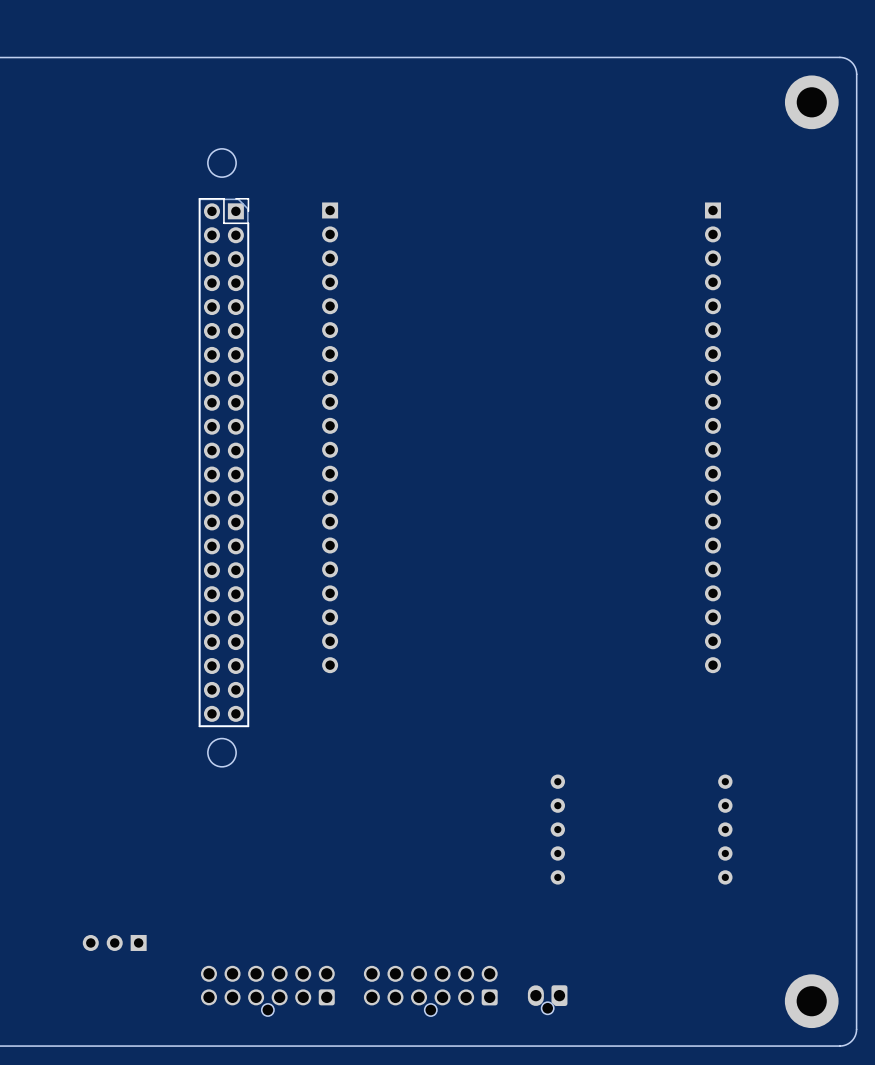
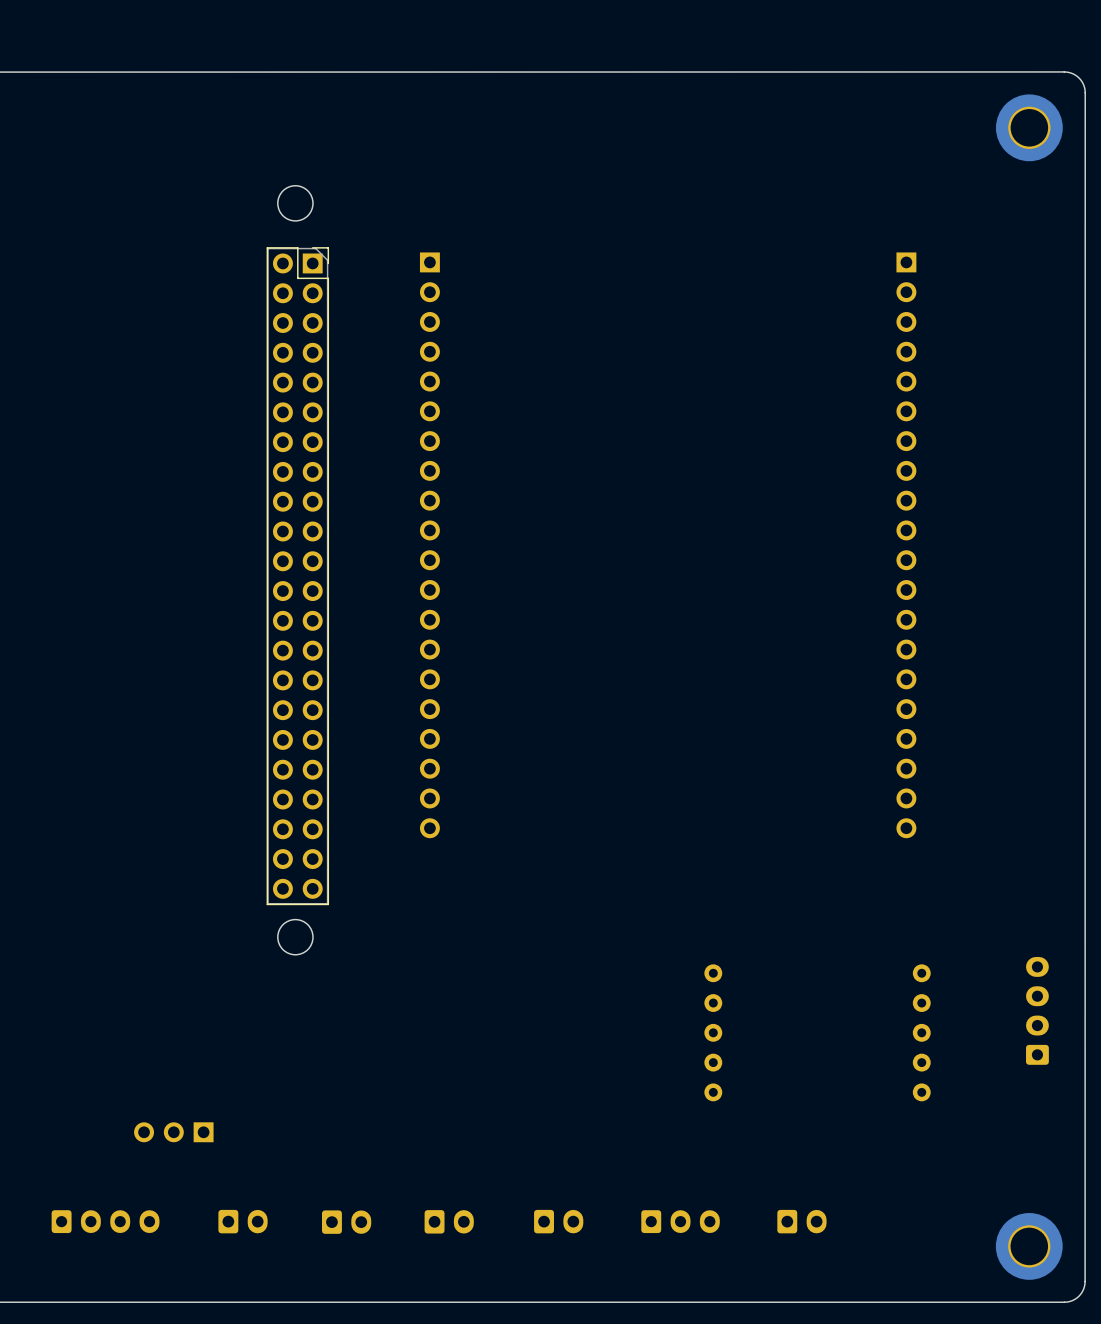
part: none -> (1037, 1010)
part position: (114, 942) -> (173, 1132)
part: none -> (105, 1221)
part: none -> (243, 1221)
part: none -> (346, 1222)
part: none -> (449, 1221)
part: none -> (558, 1221)
part: none -> (680, 1221)
part: none -> (801, 1221)
part: (267, 990) -> none
part: (430, 990) -> none
part: (547, 999) -> none

